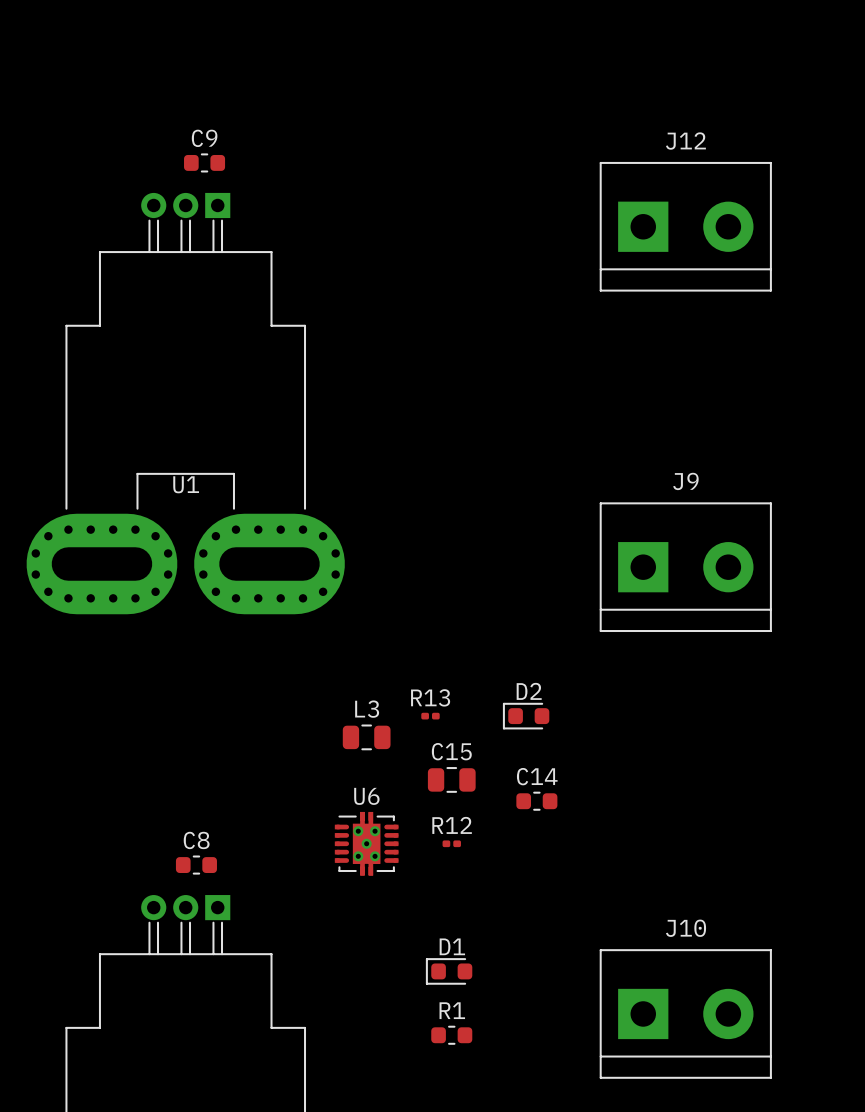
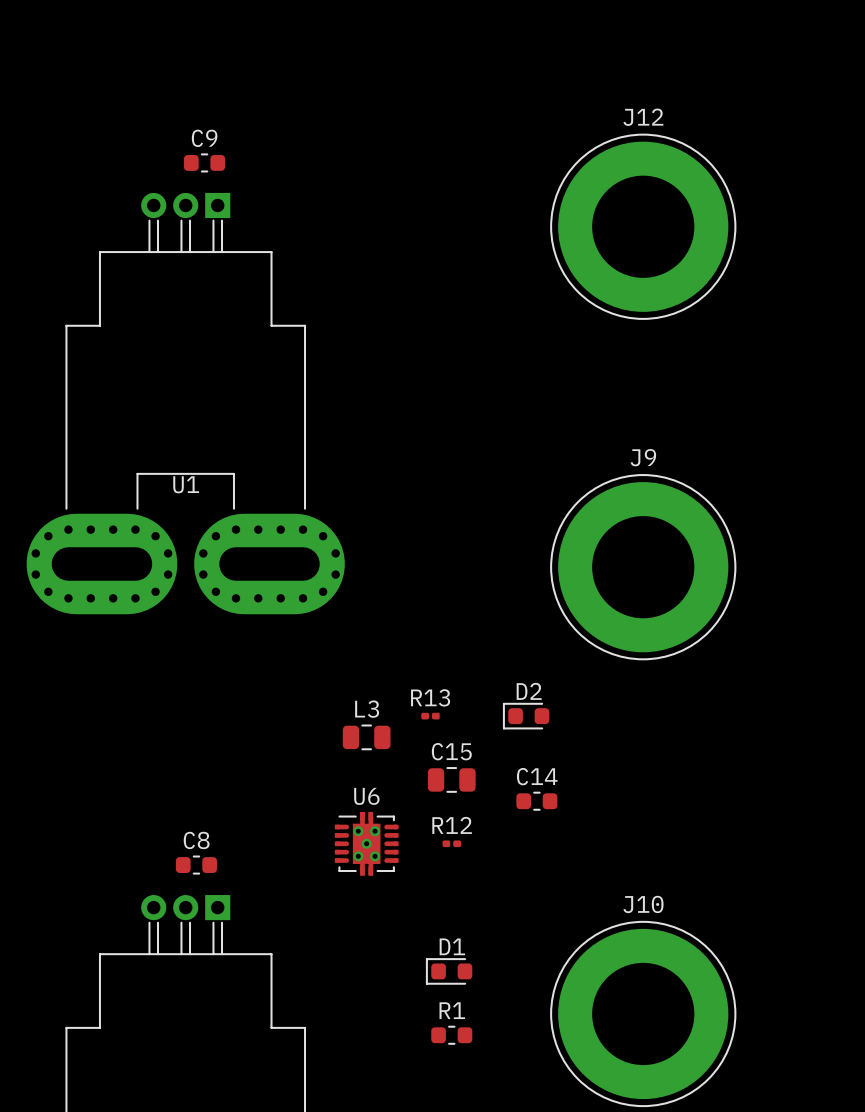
J12 footprint: [599, 161, 772, 292] -> [550, 133, 737, 320]
J9 footprint: [599, 502, 772, 633] -> [550, 474, 737, 661]
J10 footprint: [599, 949, 772, 1079] -> [550, 920, 737, 1108]

